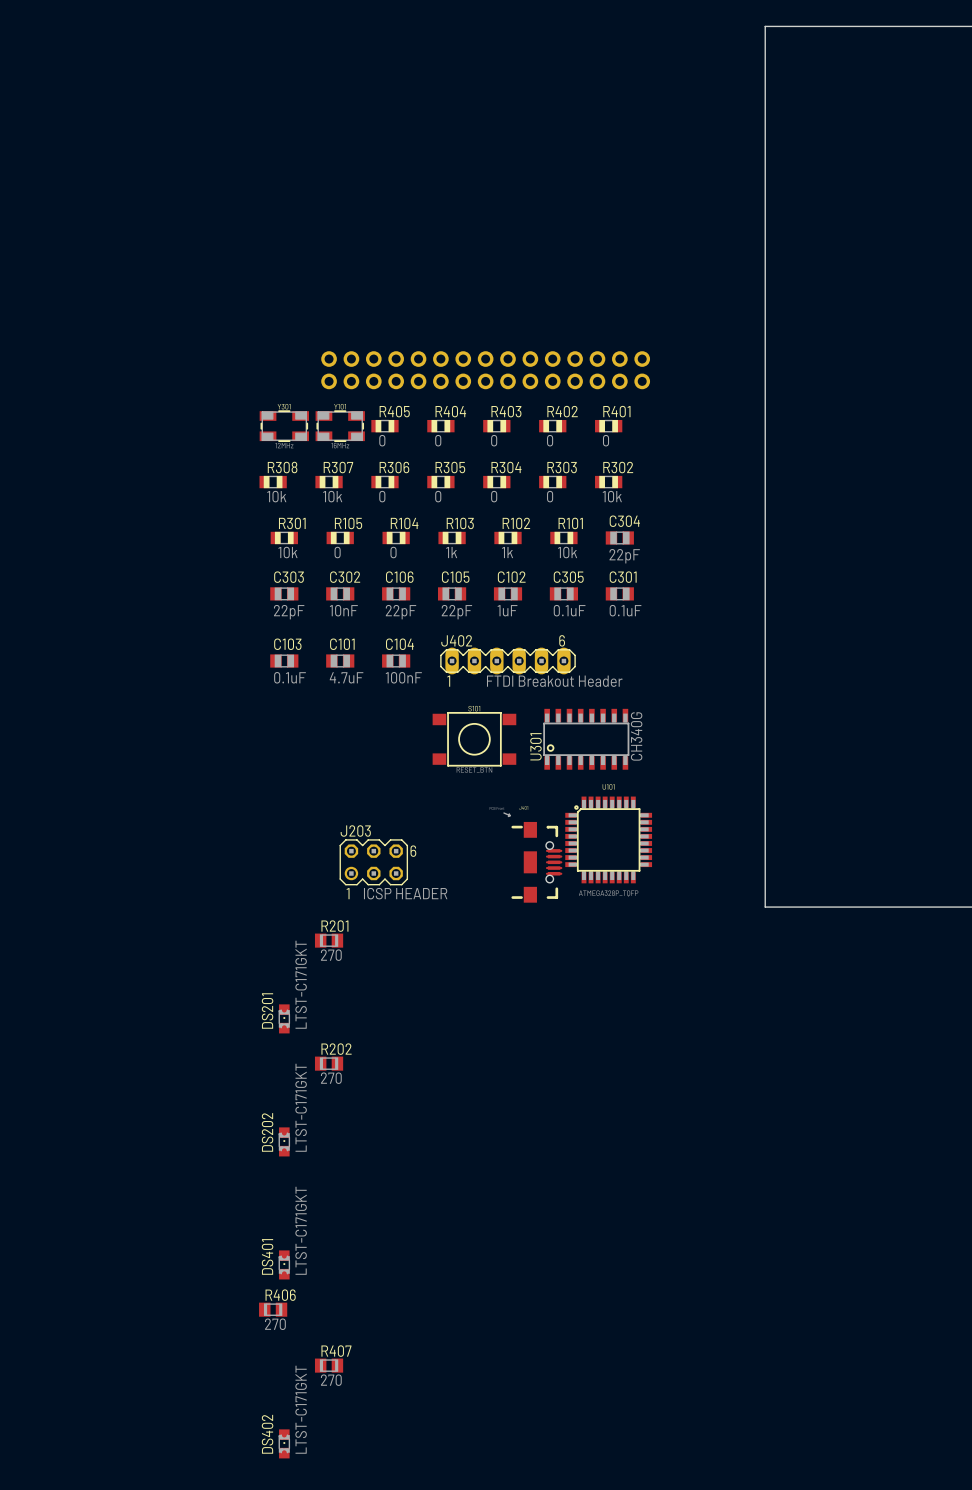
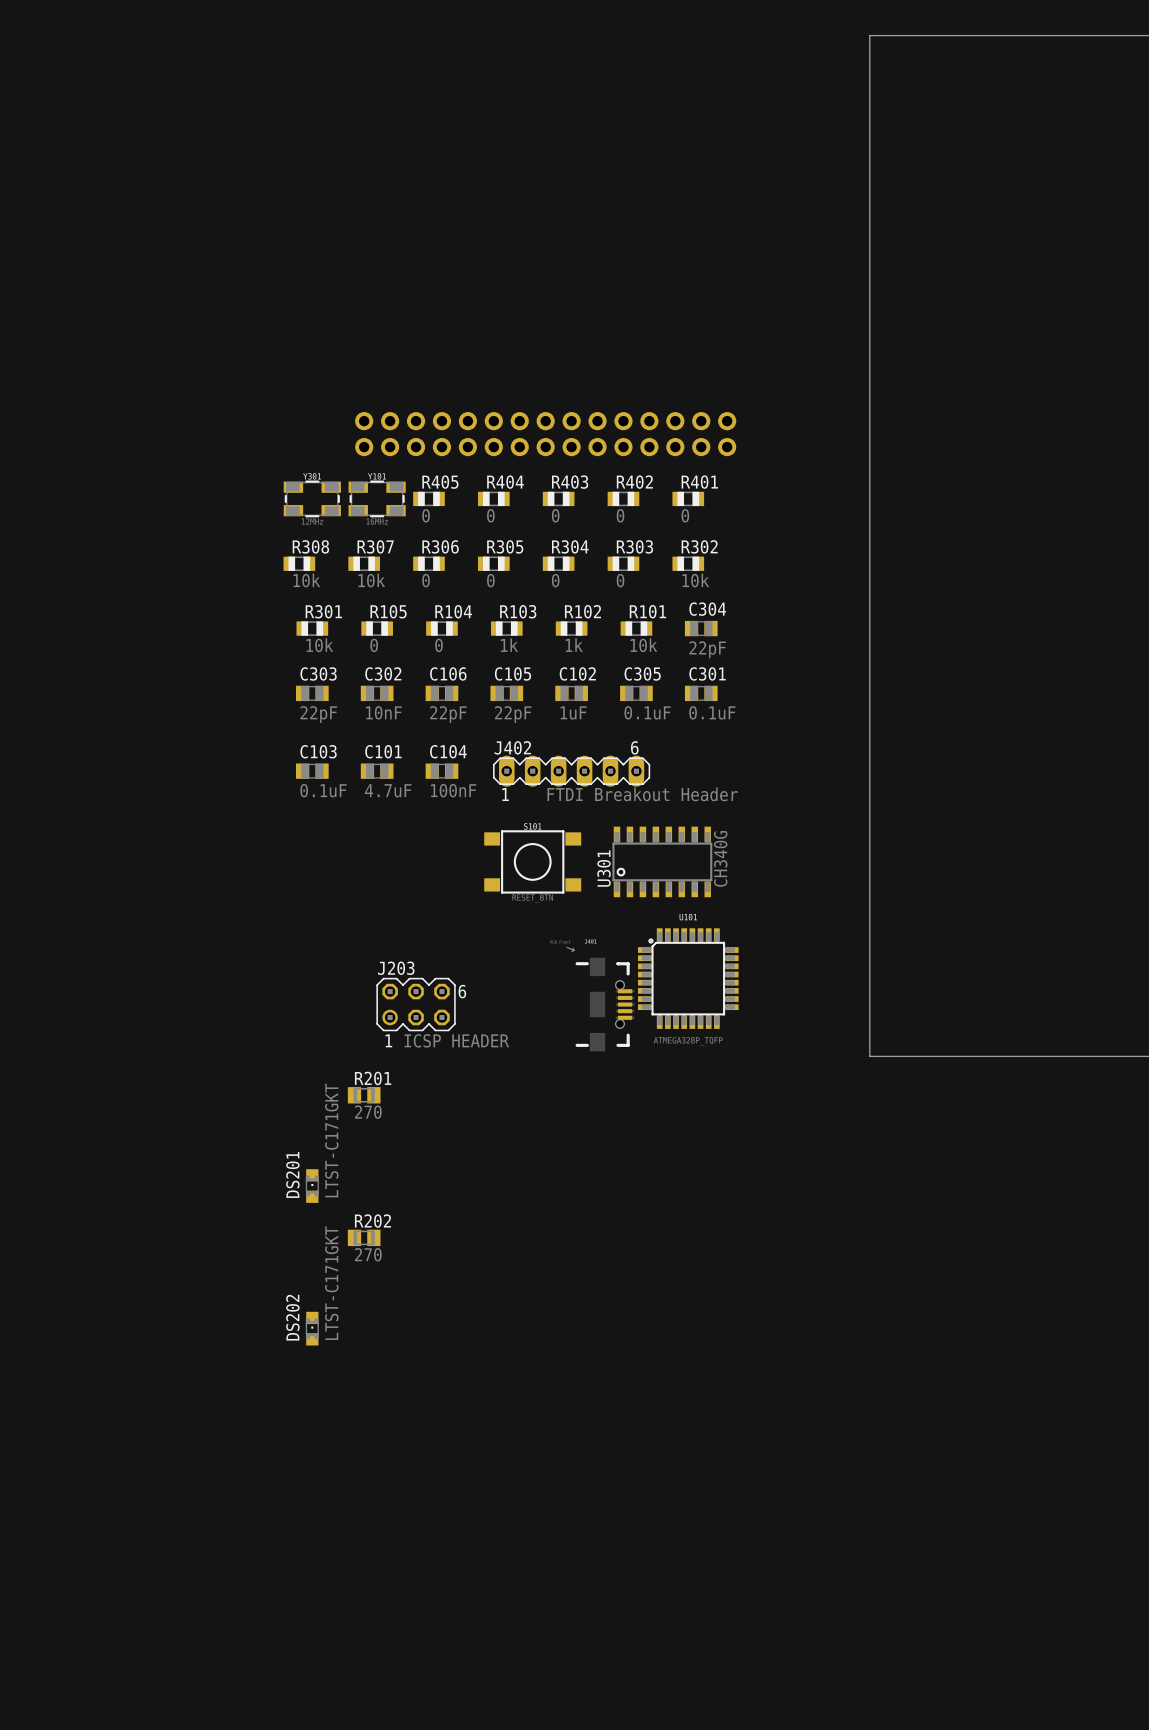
DS401: LTST-C171GKT (284, 1264) -> none
R406: 270 (273, 1309) -> none
R407: 270 (329, 1365) -> none
DS402: LTST-C171GKT (284, 1443) -> none

